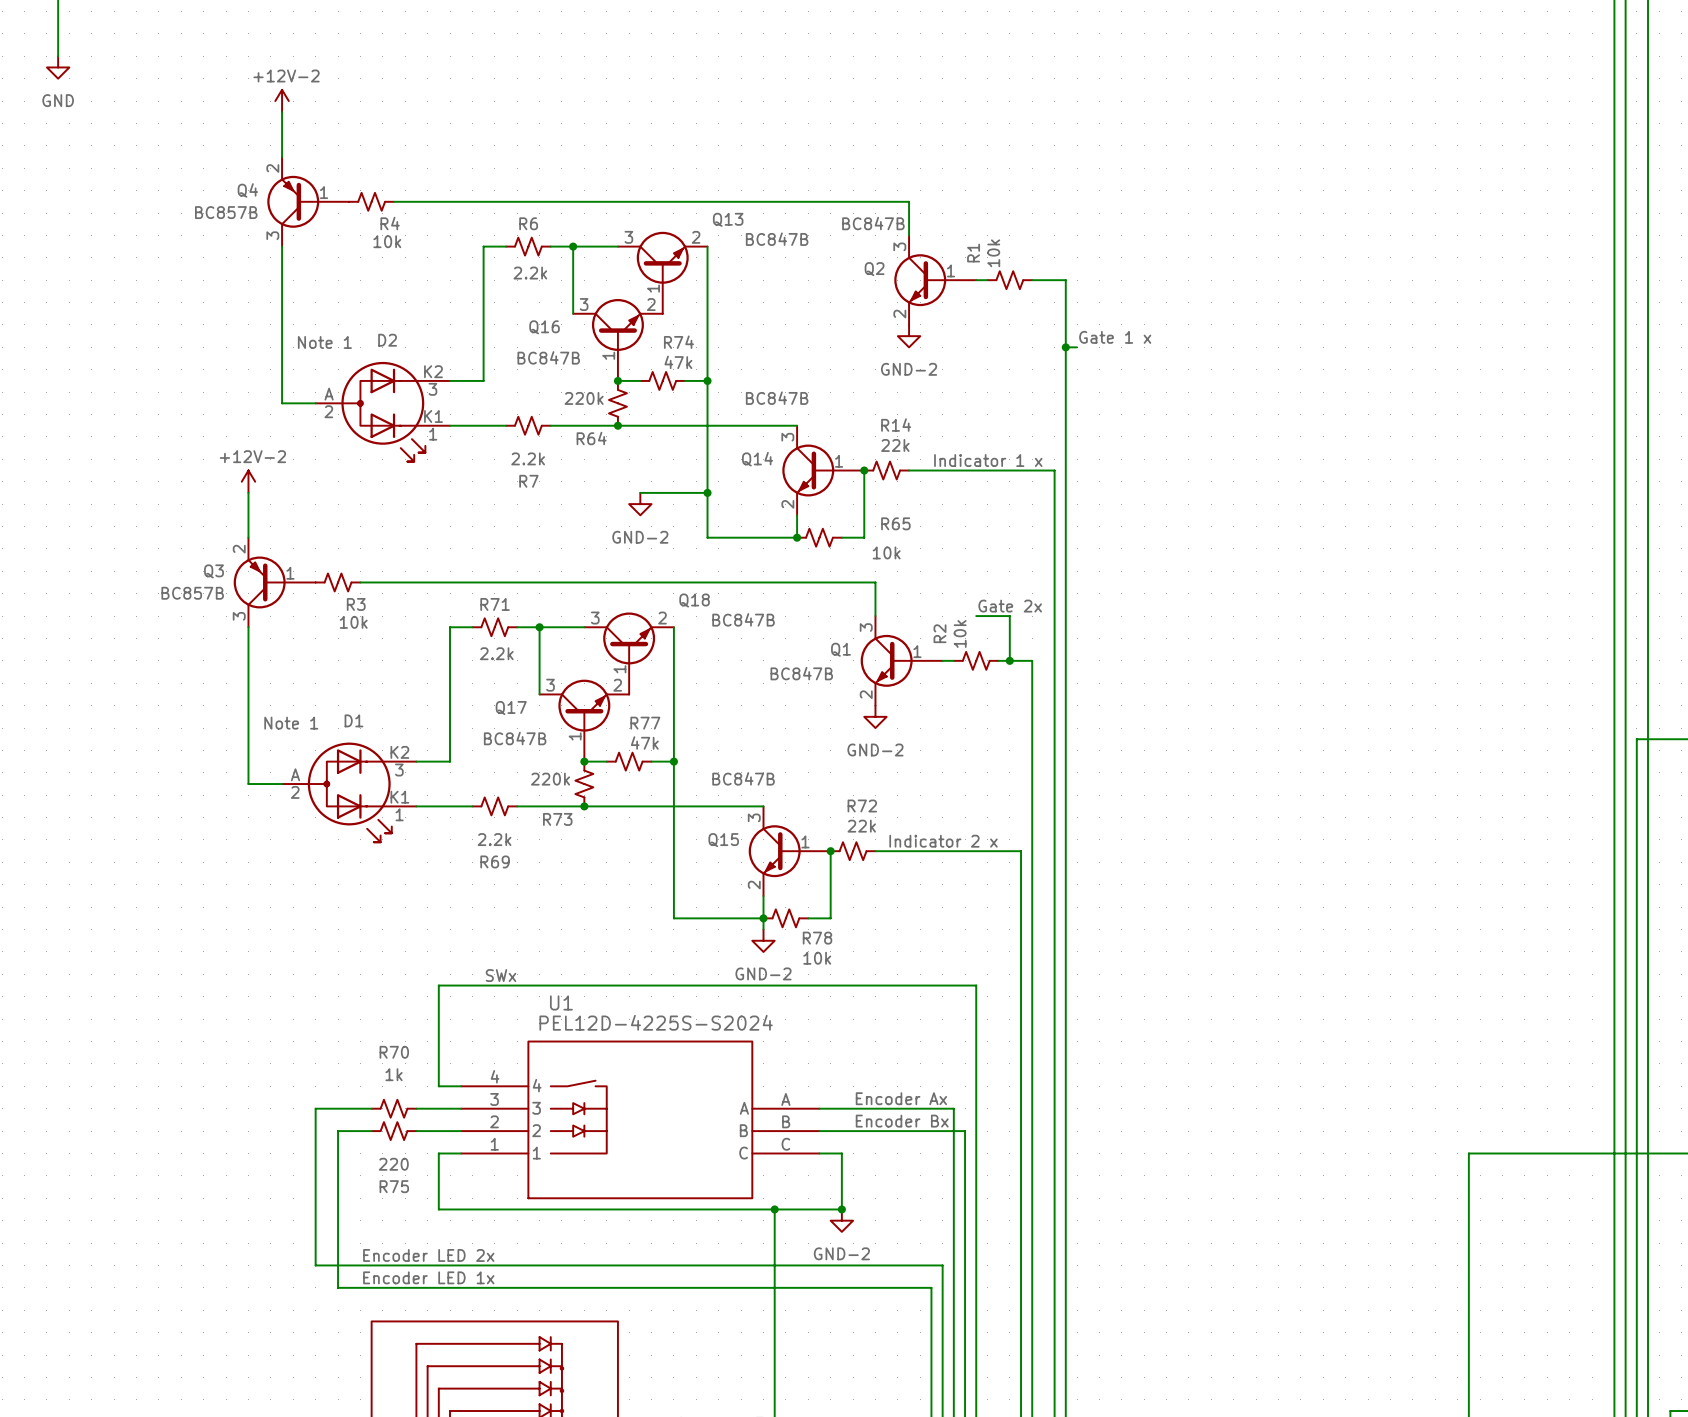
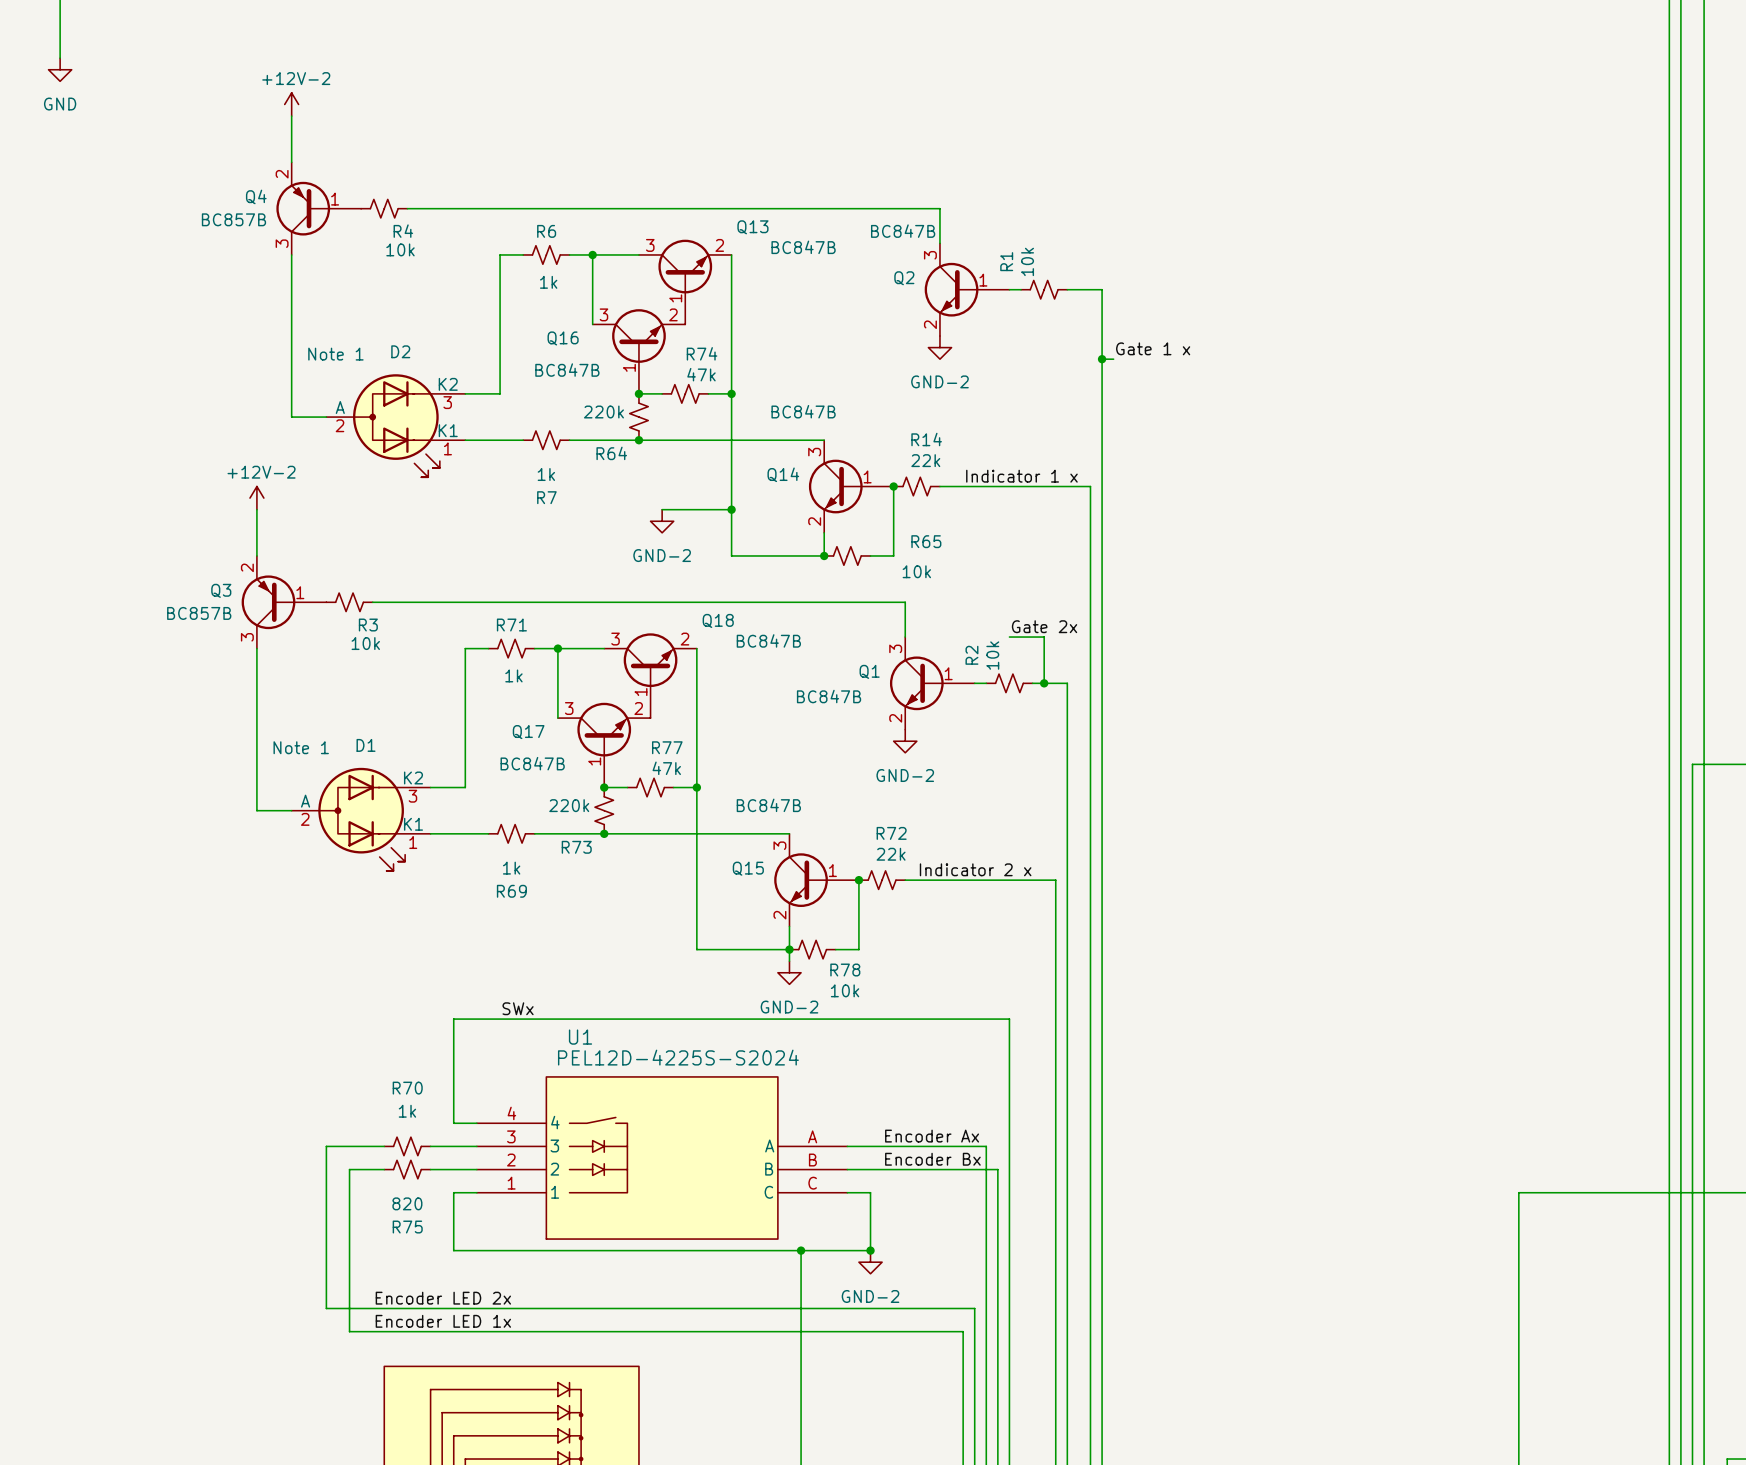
R6 value: 2.2k (530, 273) -> 1k (548, 282)
R7 value: 2.2k (528, 458) -> 1k (546, 474)
R71 value: 2.2k (496, 653) -> 1k (513, 675)
R69 value: 2.2k (494, 839) -> 1k (511, 868)
R75 value: 220 (393, 1164) -> 820 (407, 1203)

